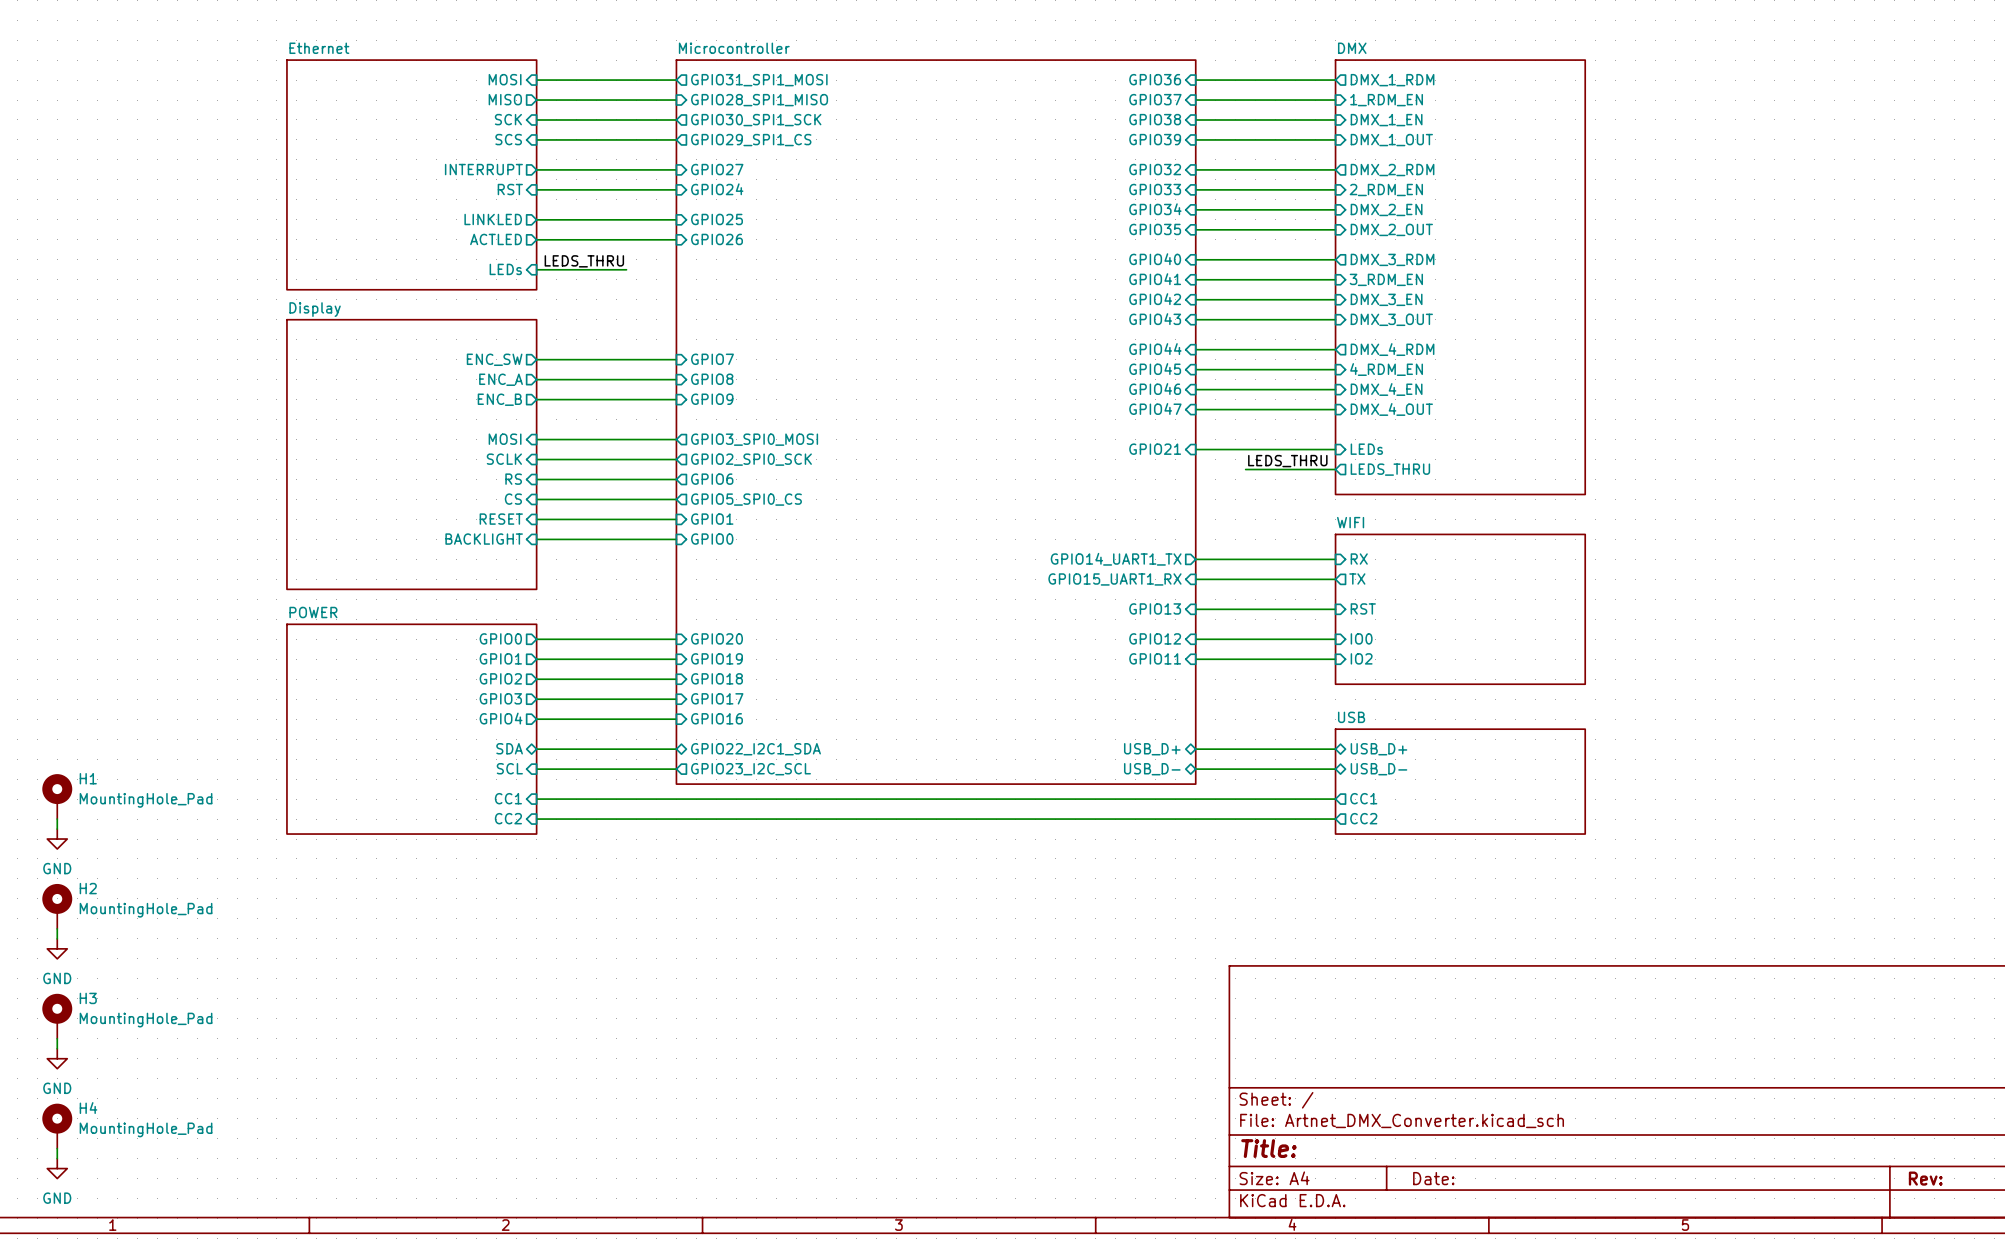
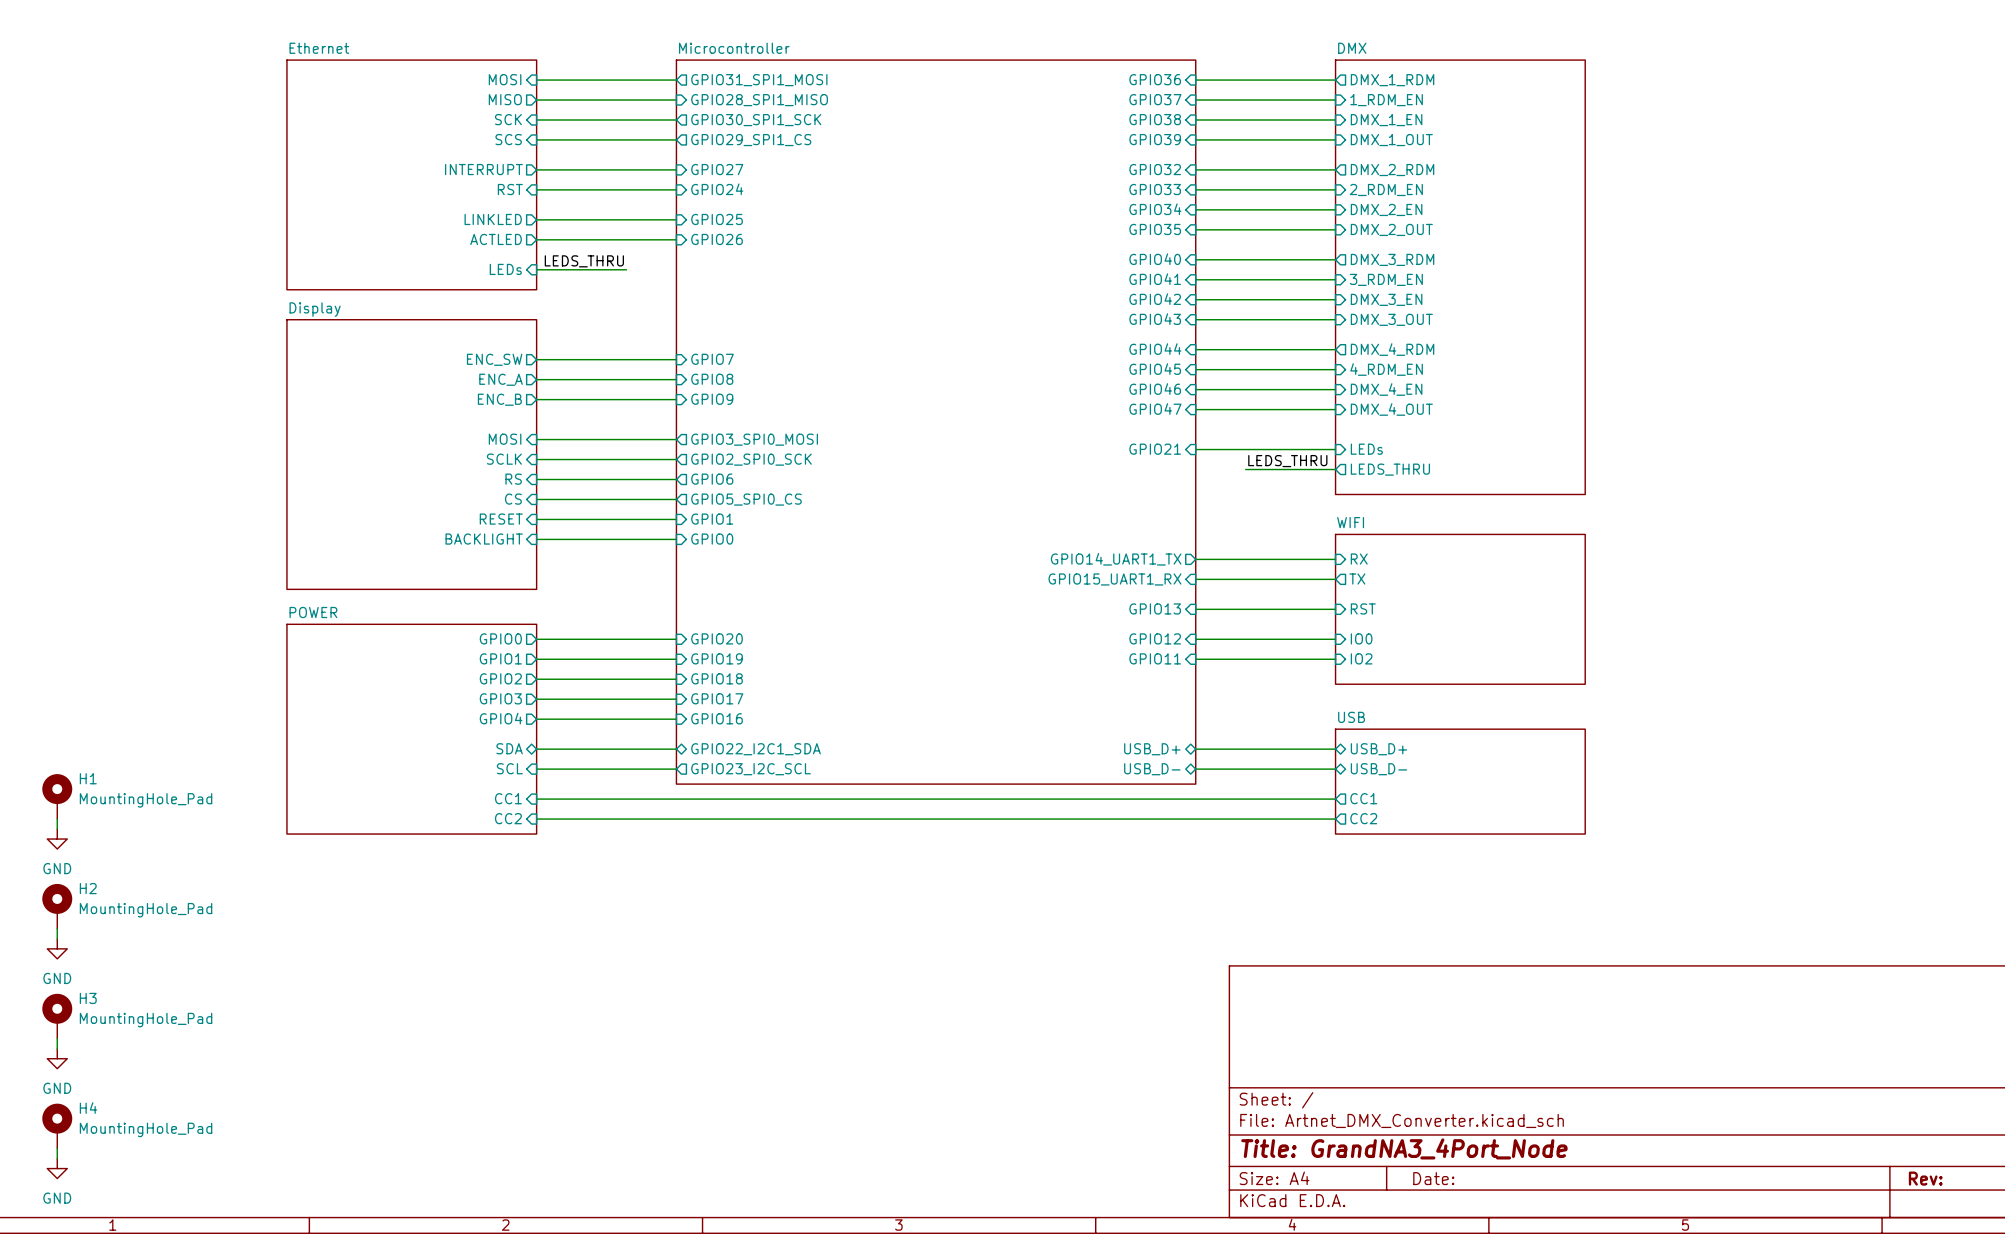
title block: Title: (1268, 1148) -> Title: GrandNA3_4Port_Node (1404, 1148)

